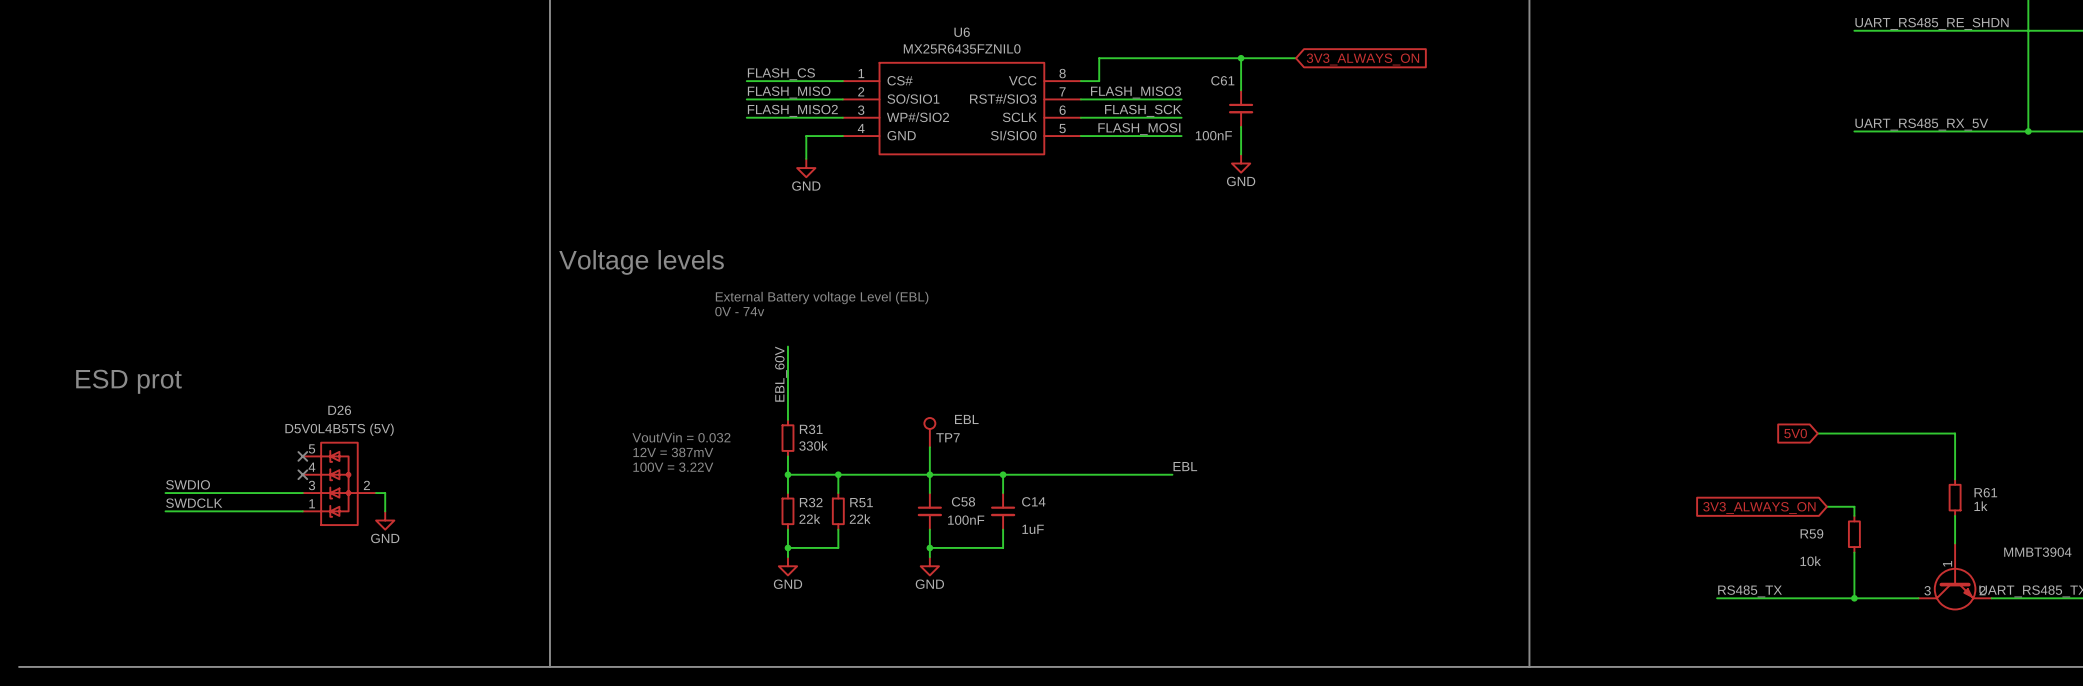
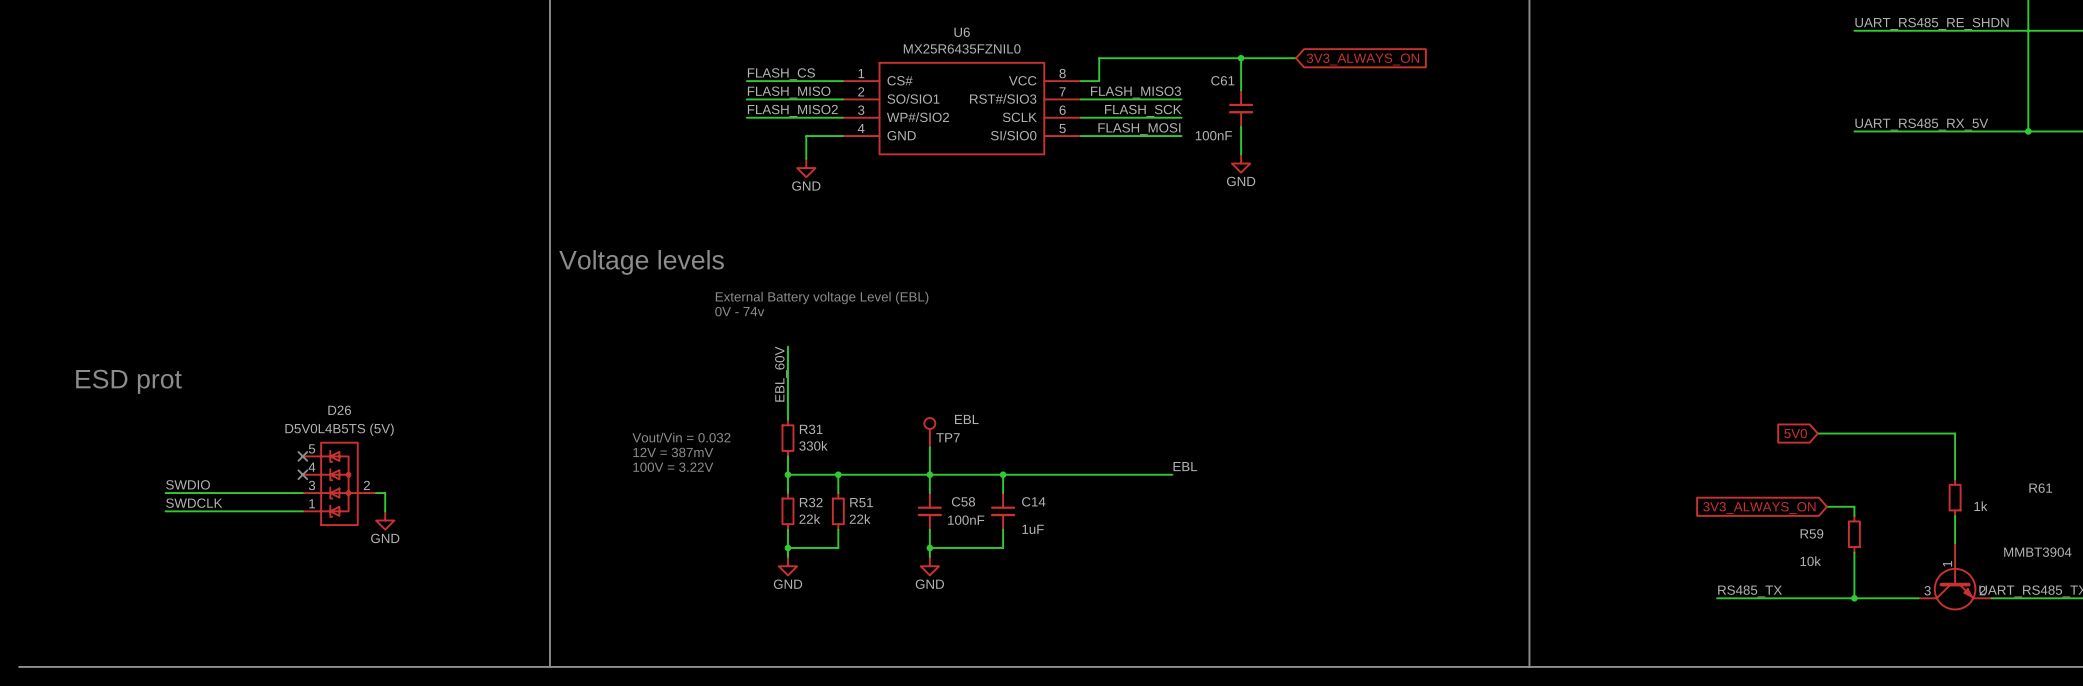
R61 name position: R61 (1985, 492) -> R61 (2040, 488)

